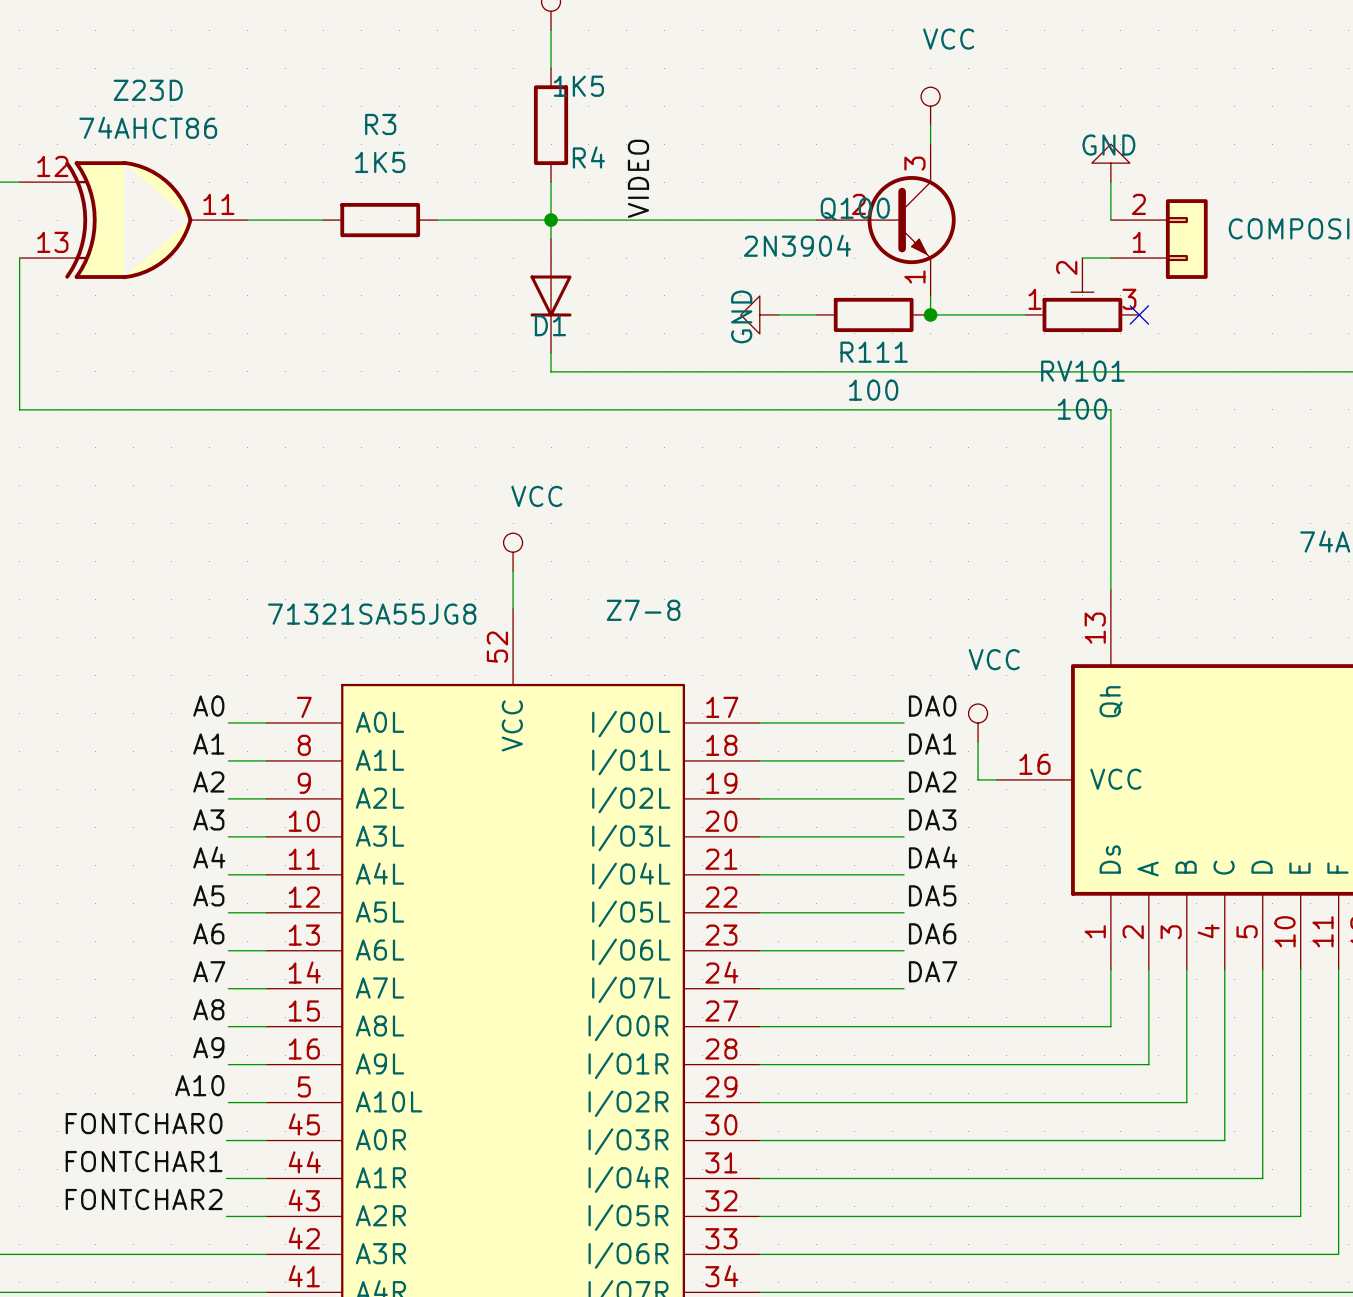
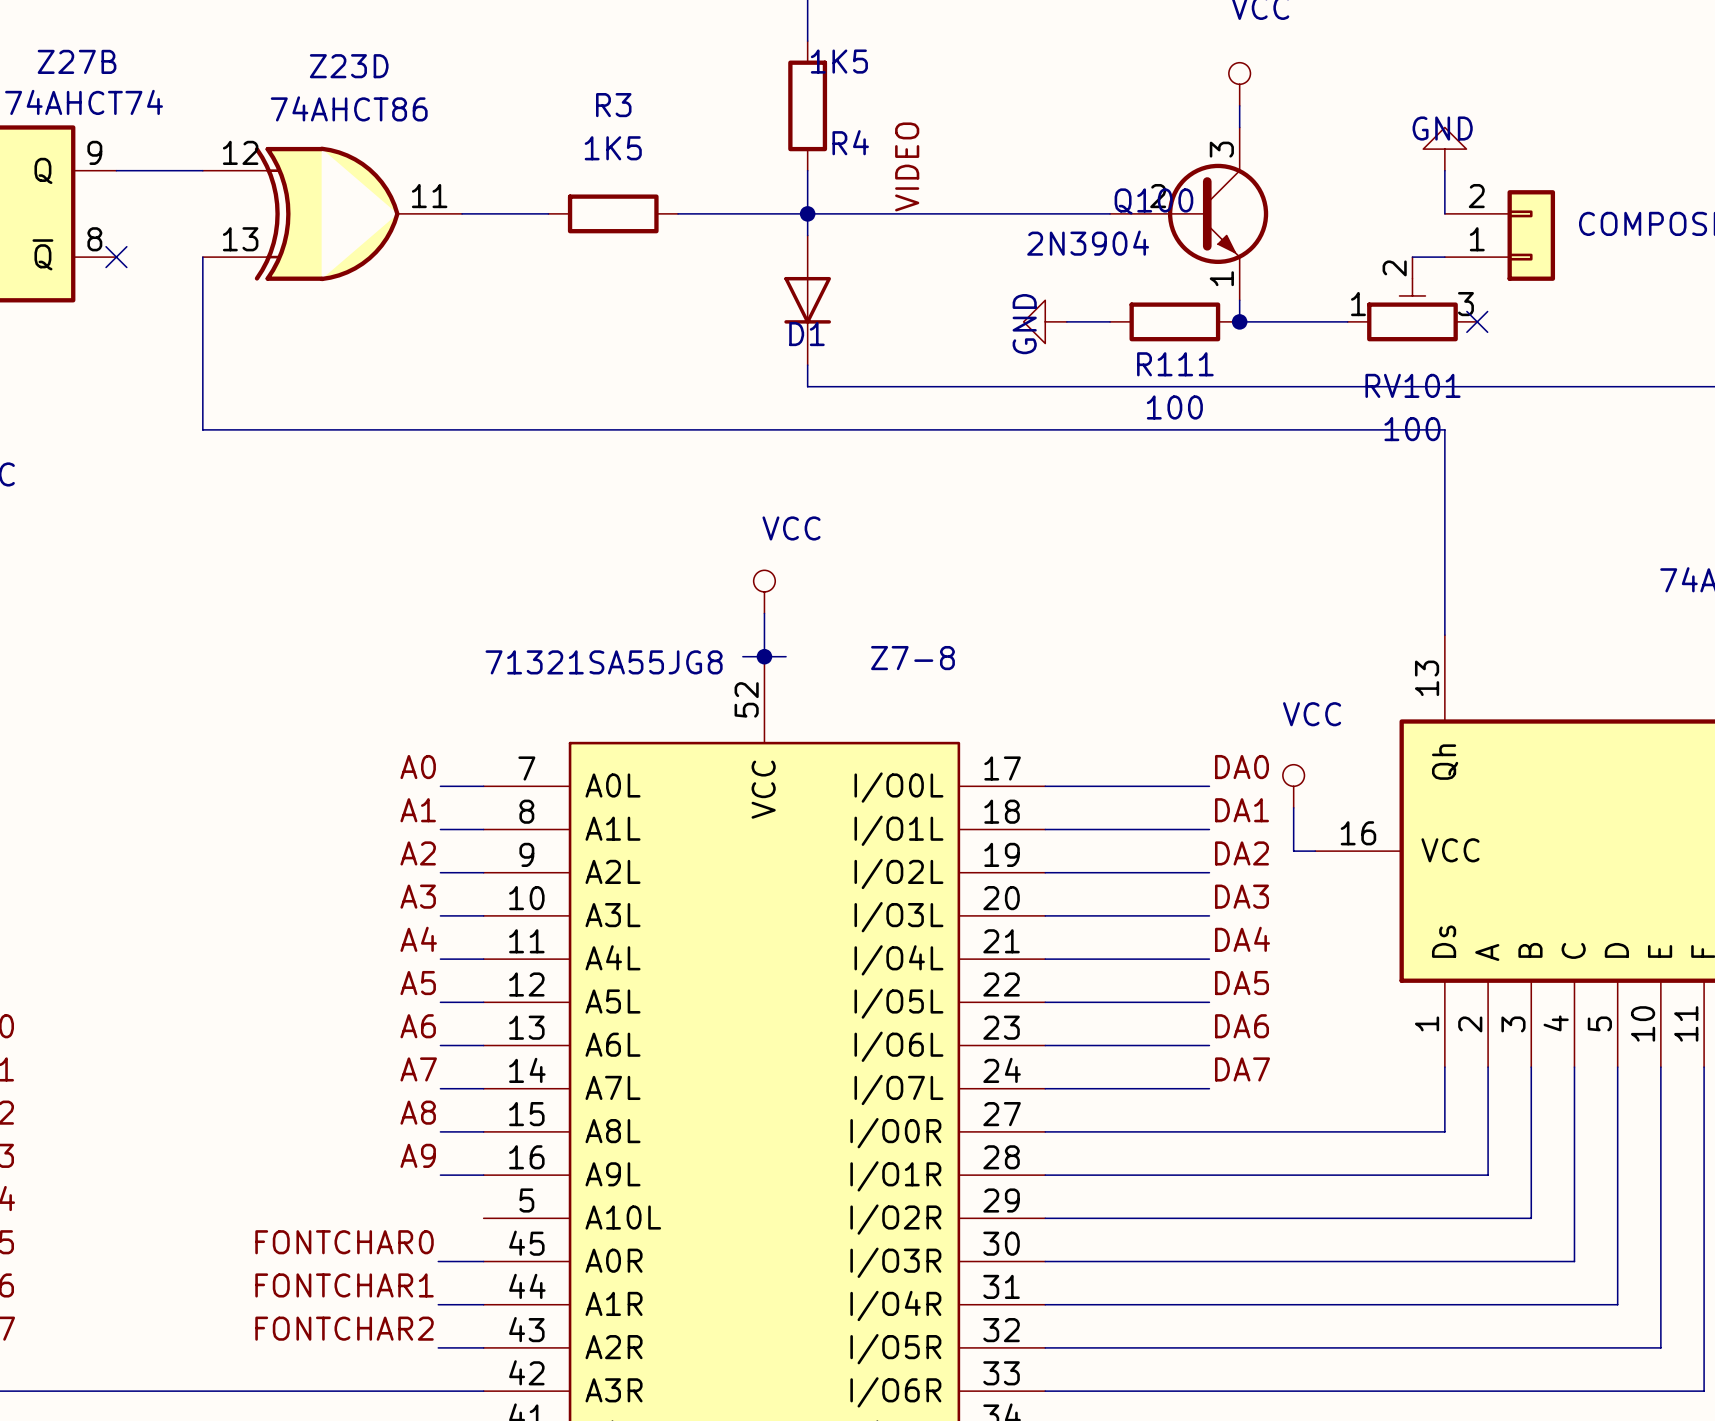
wire: none -> (742, 656) (786, 656)
junction: none -> (764, 656)
label: A10 (199, 1085) -> none
wire: (228, 1102) (266, 1102) -> none

